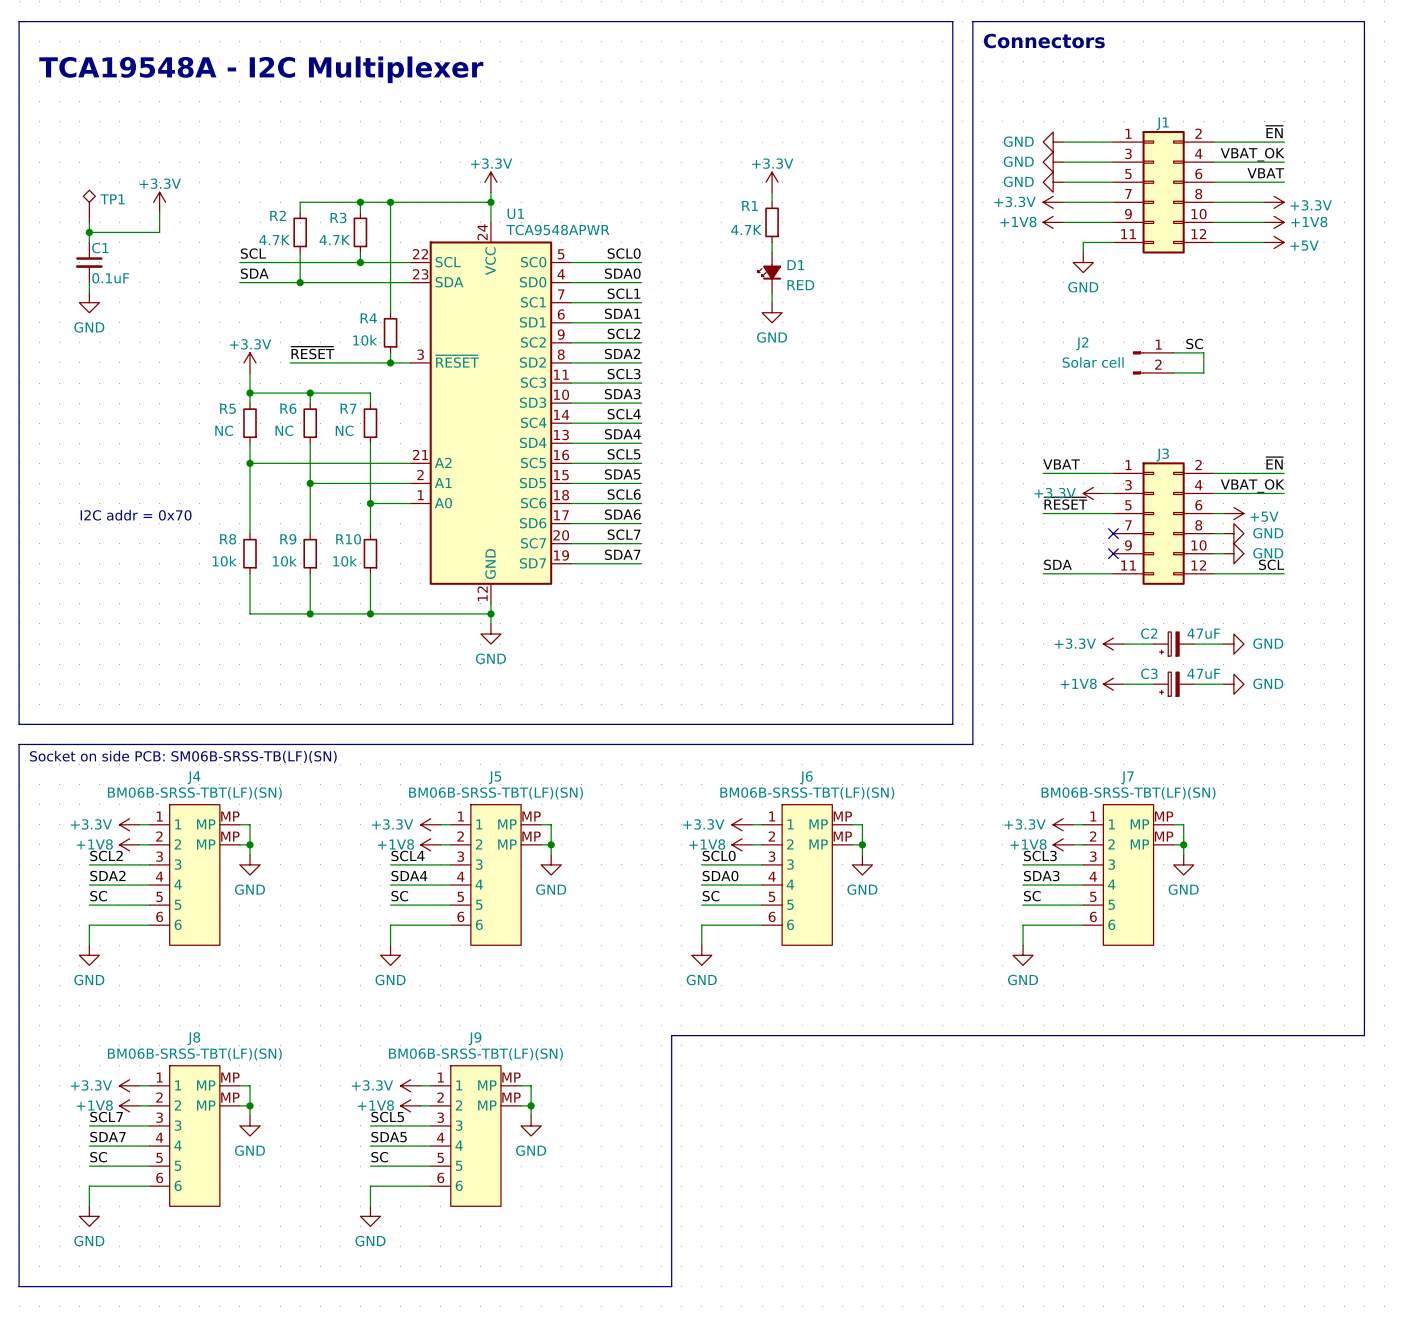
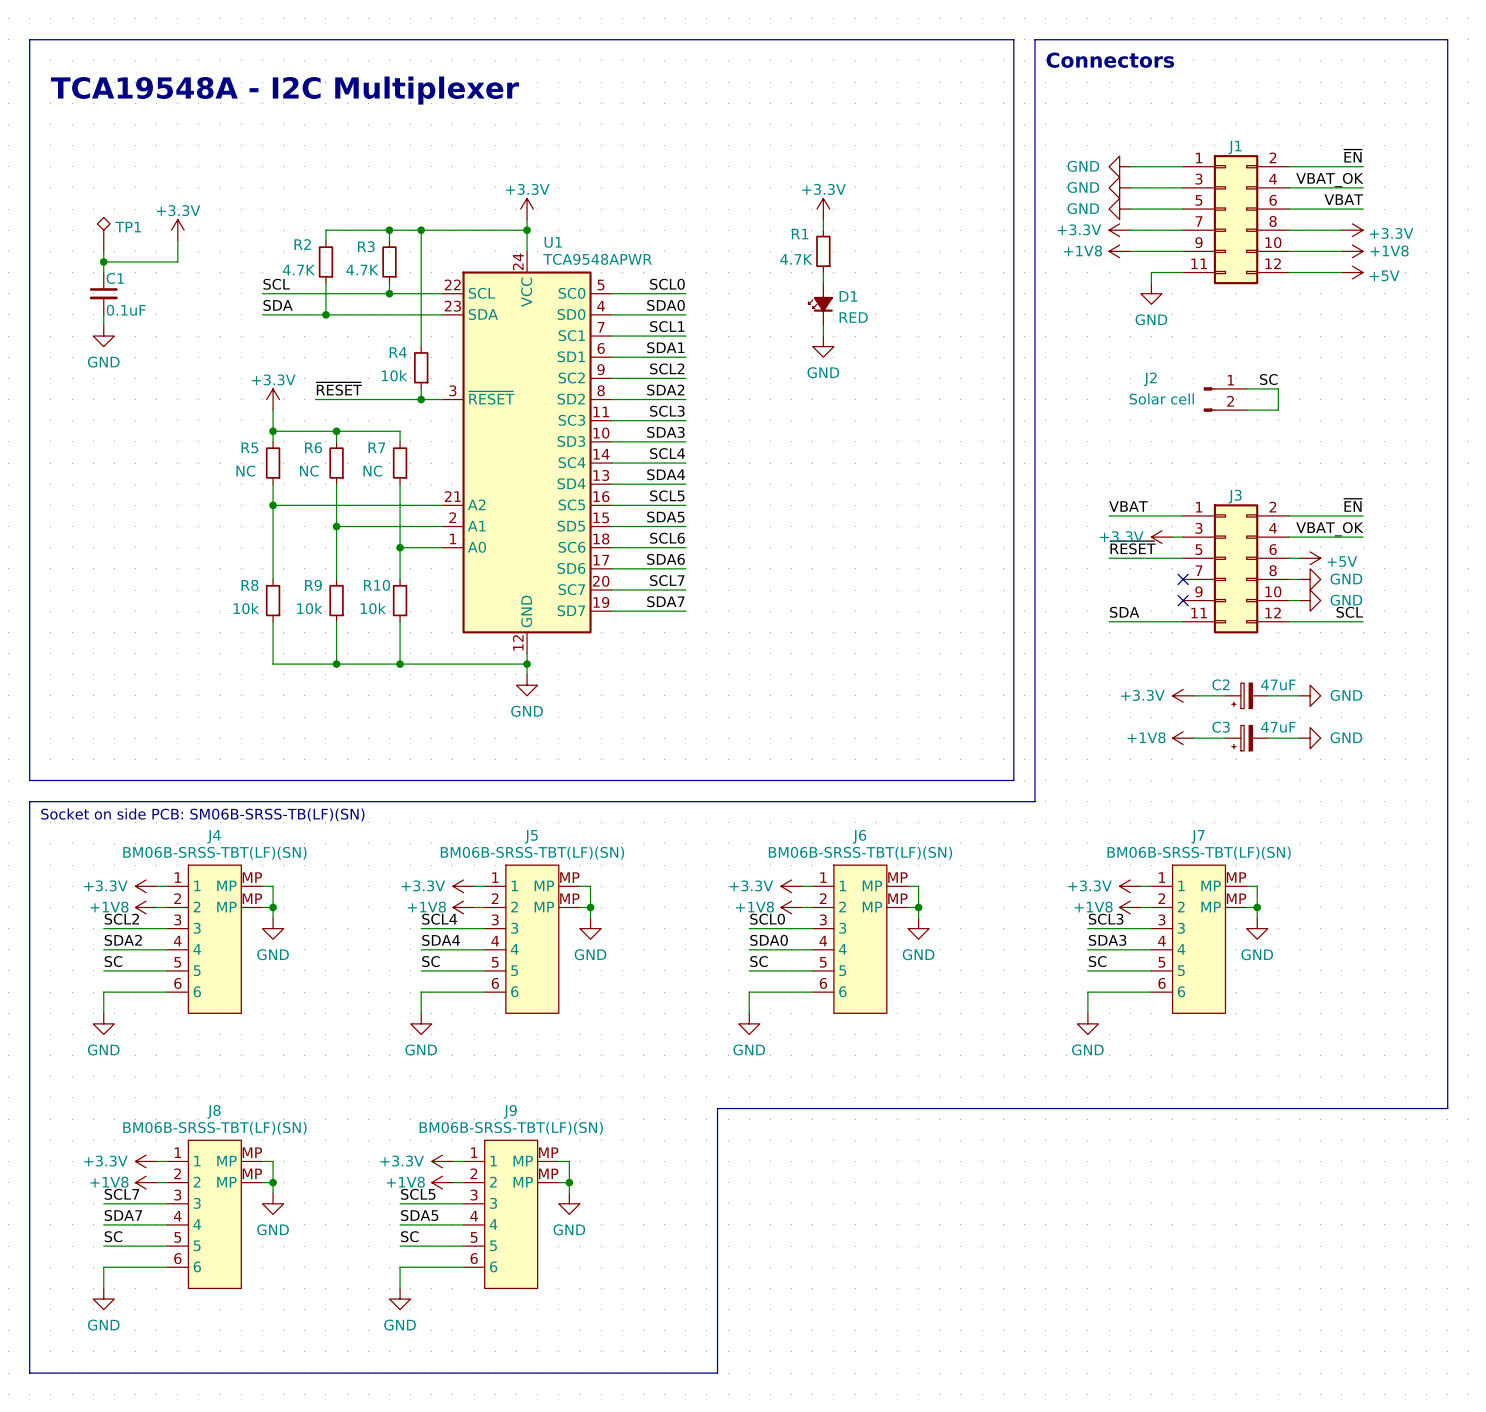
text: I2C addr = 0x70 (136, 515) -> none

